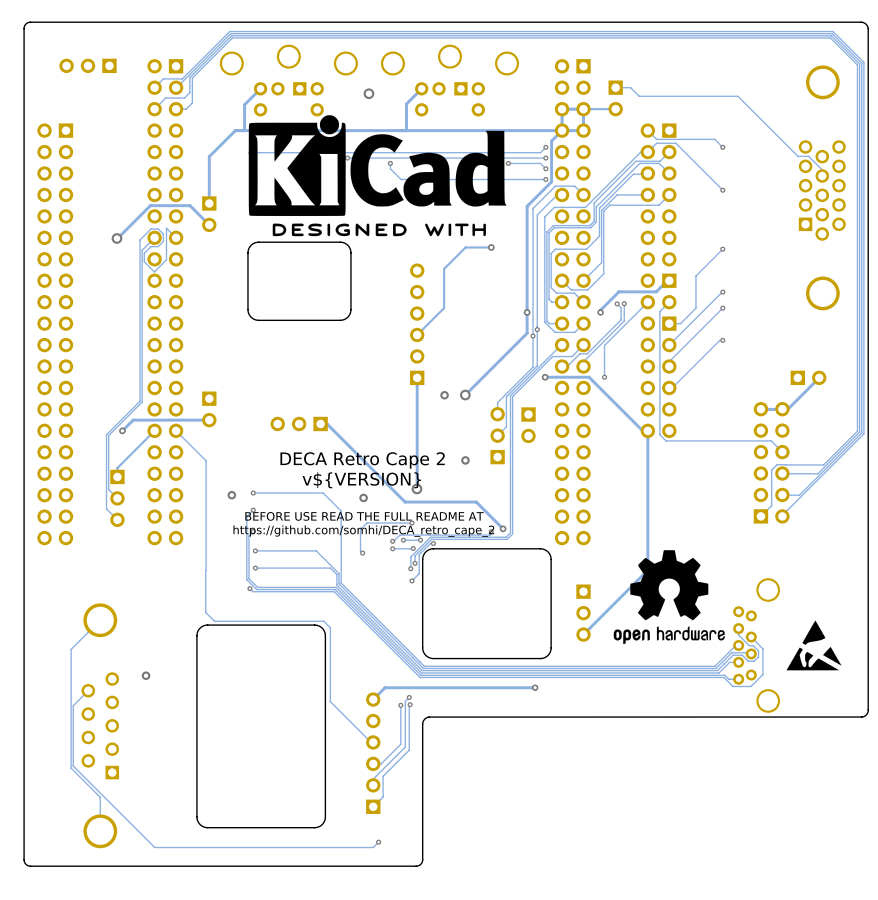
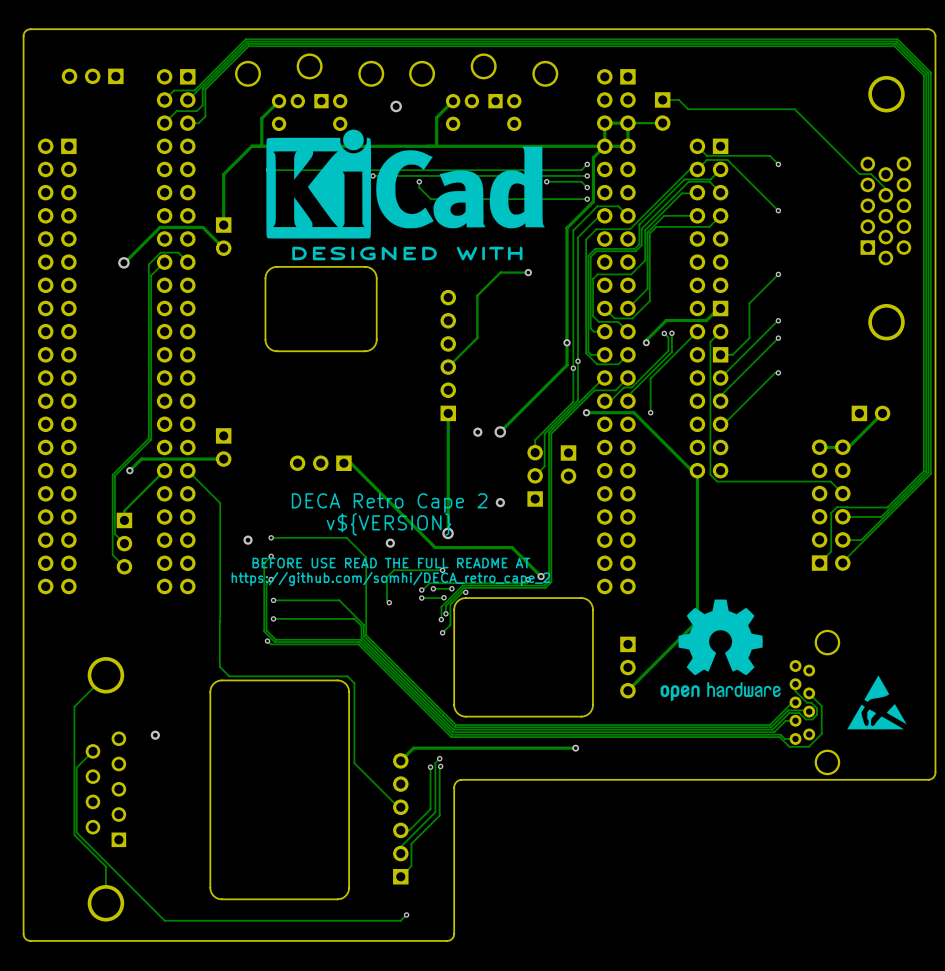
track: (167, 229) (166, 259) (154, 271) (144, 261) (144, 253) (150, 246) (158, 246) (163, 241) (163, 234) (158, 229) -> (178, 252) (168, 252)

